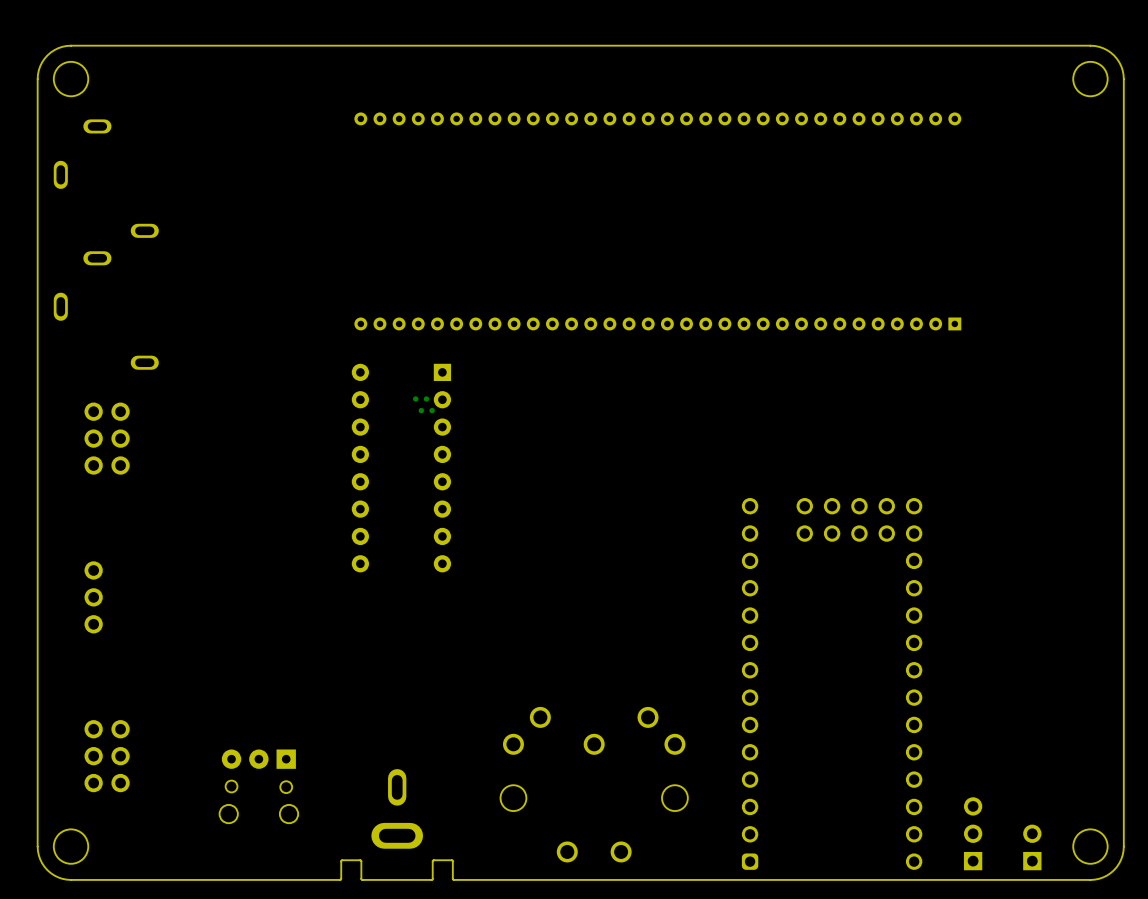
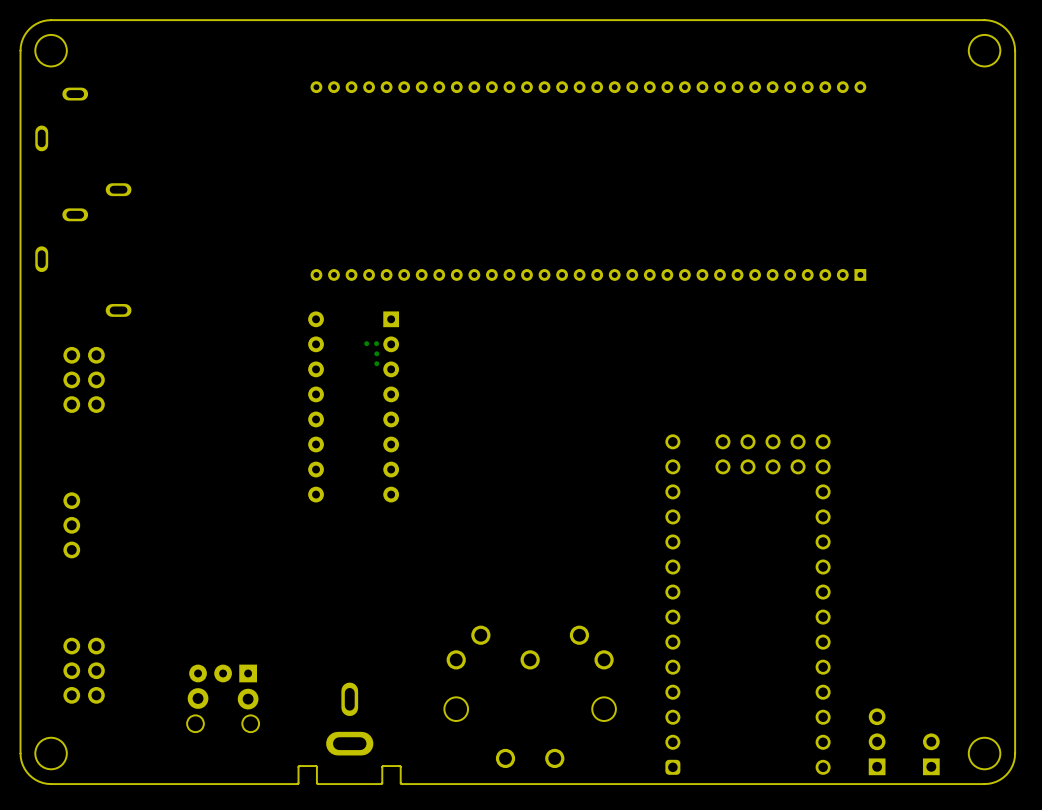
part rotation: 0° (426, 410) -> 90° clockwise (376, 358)
part footprint: [219, 749, 299, 824] -> [187, 664, 260, 733]

